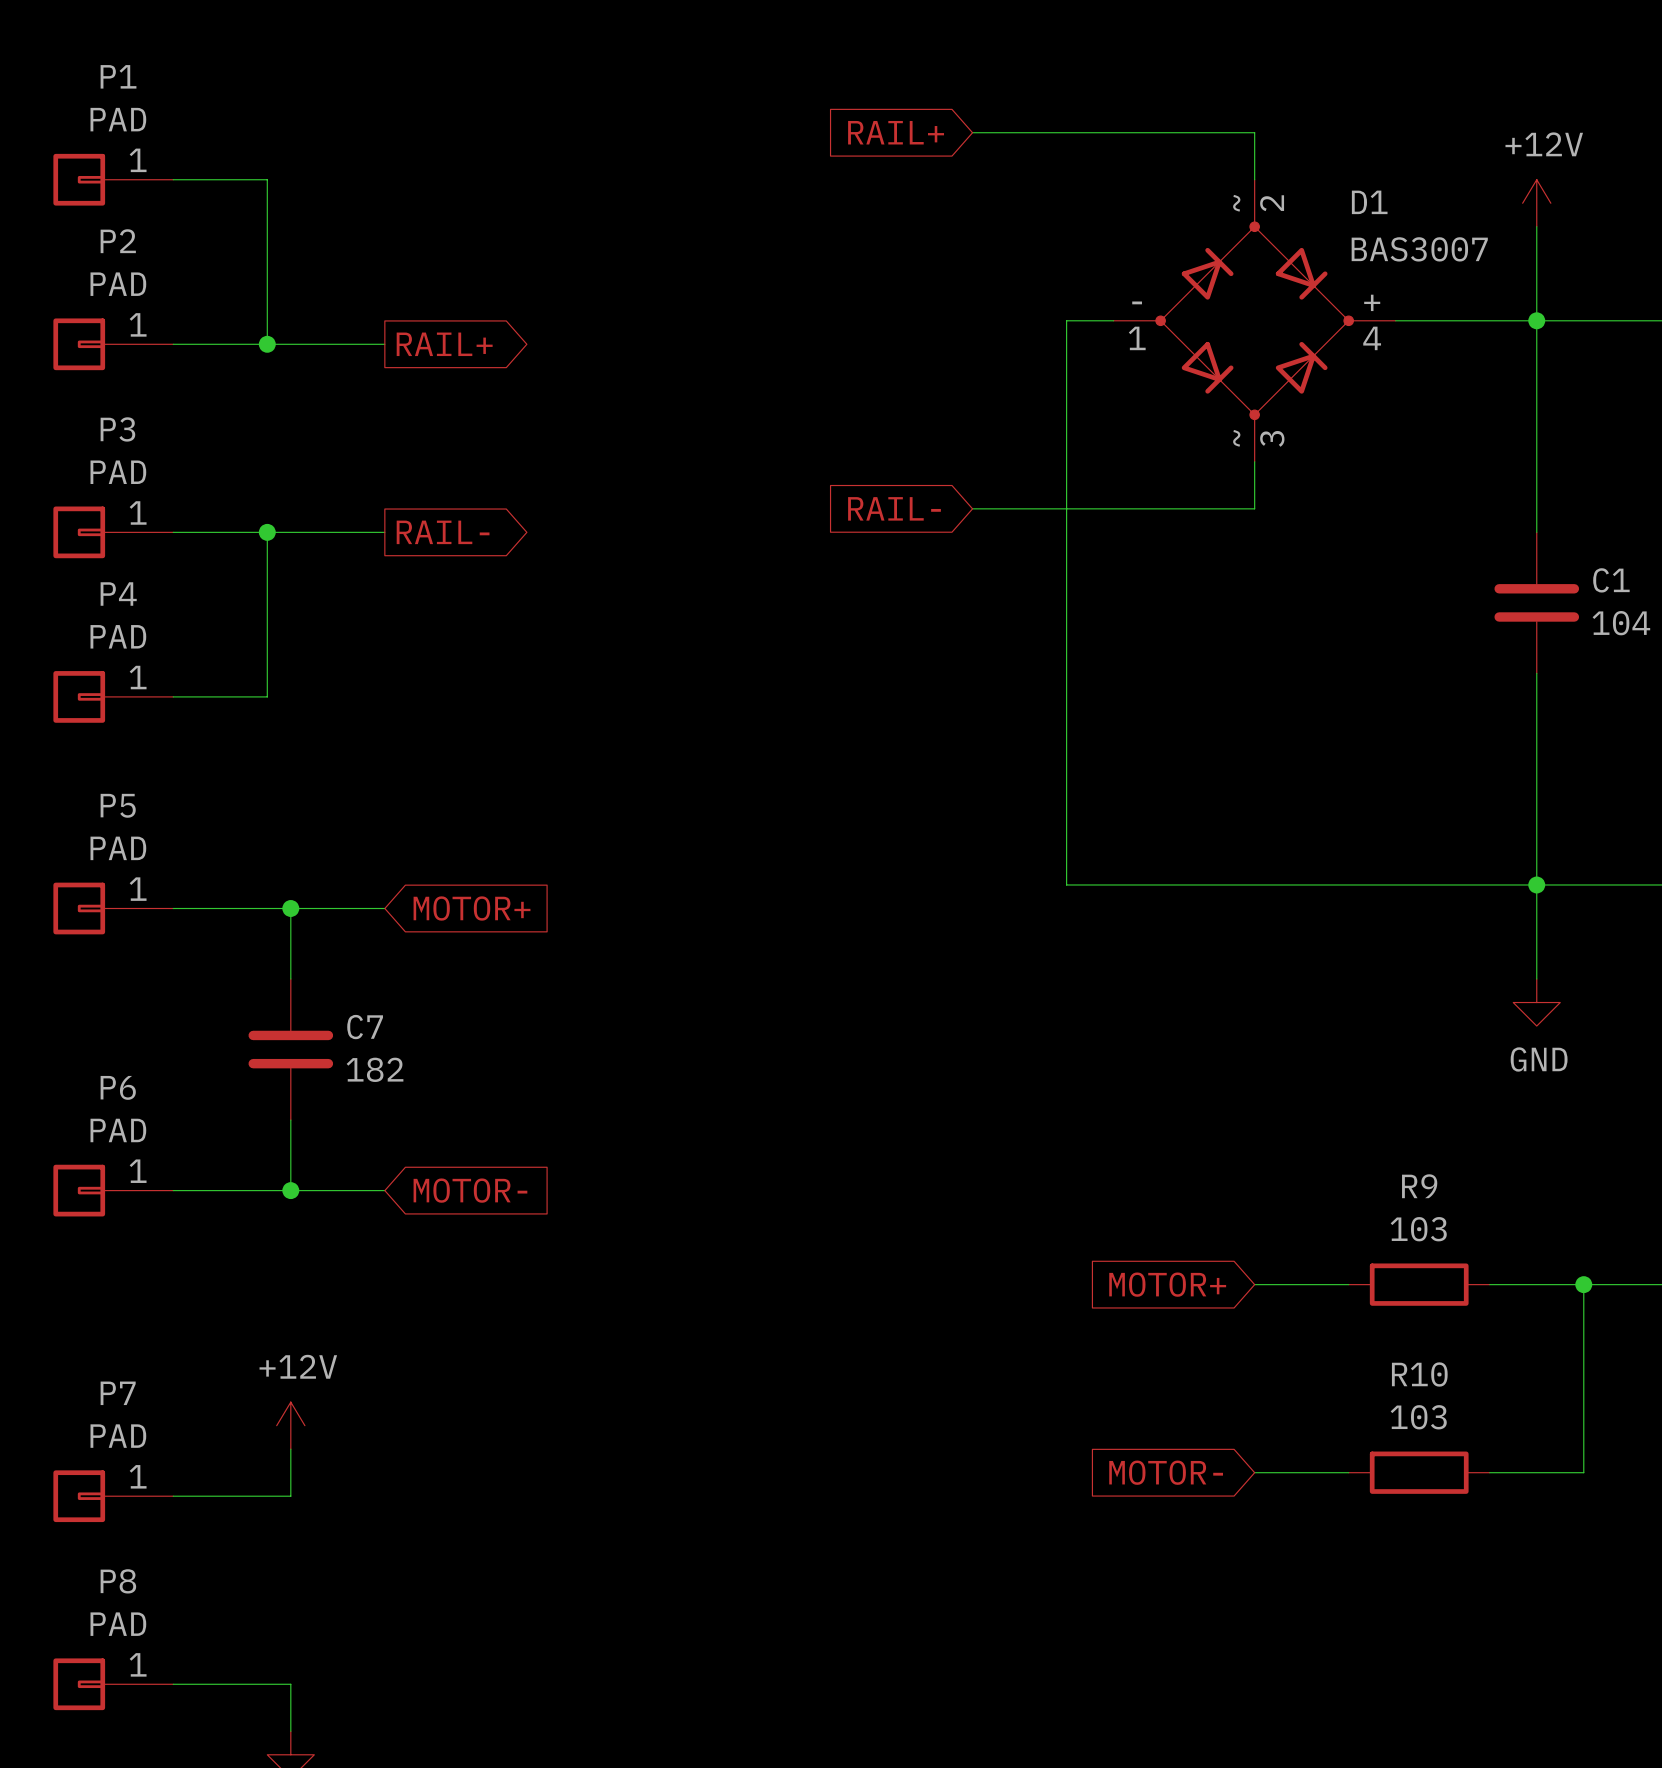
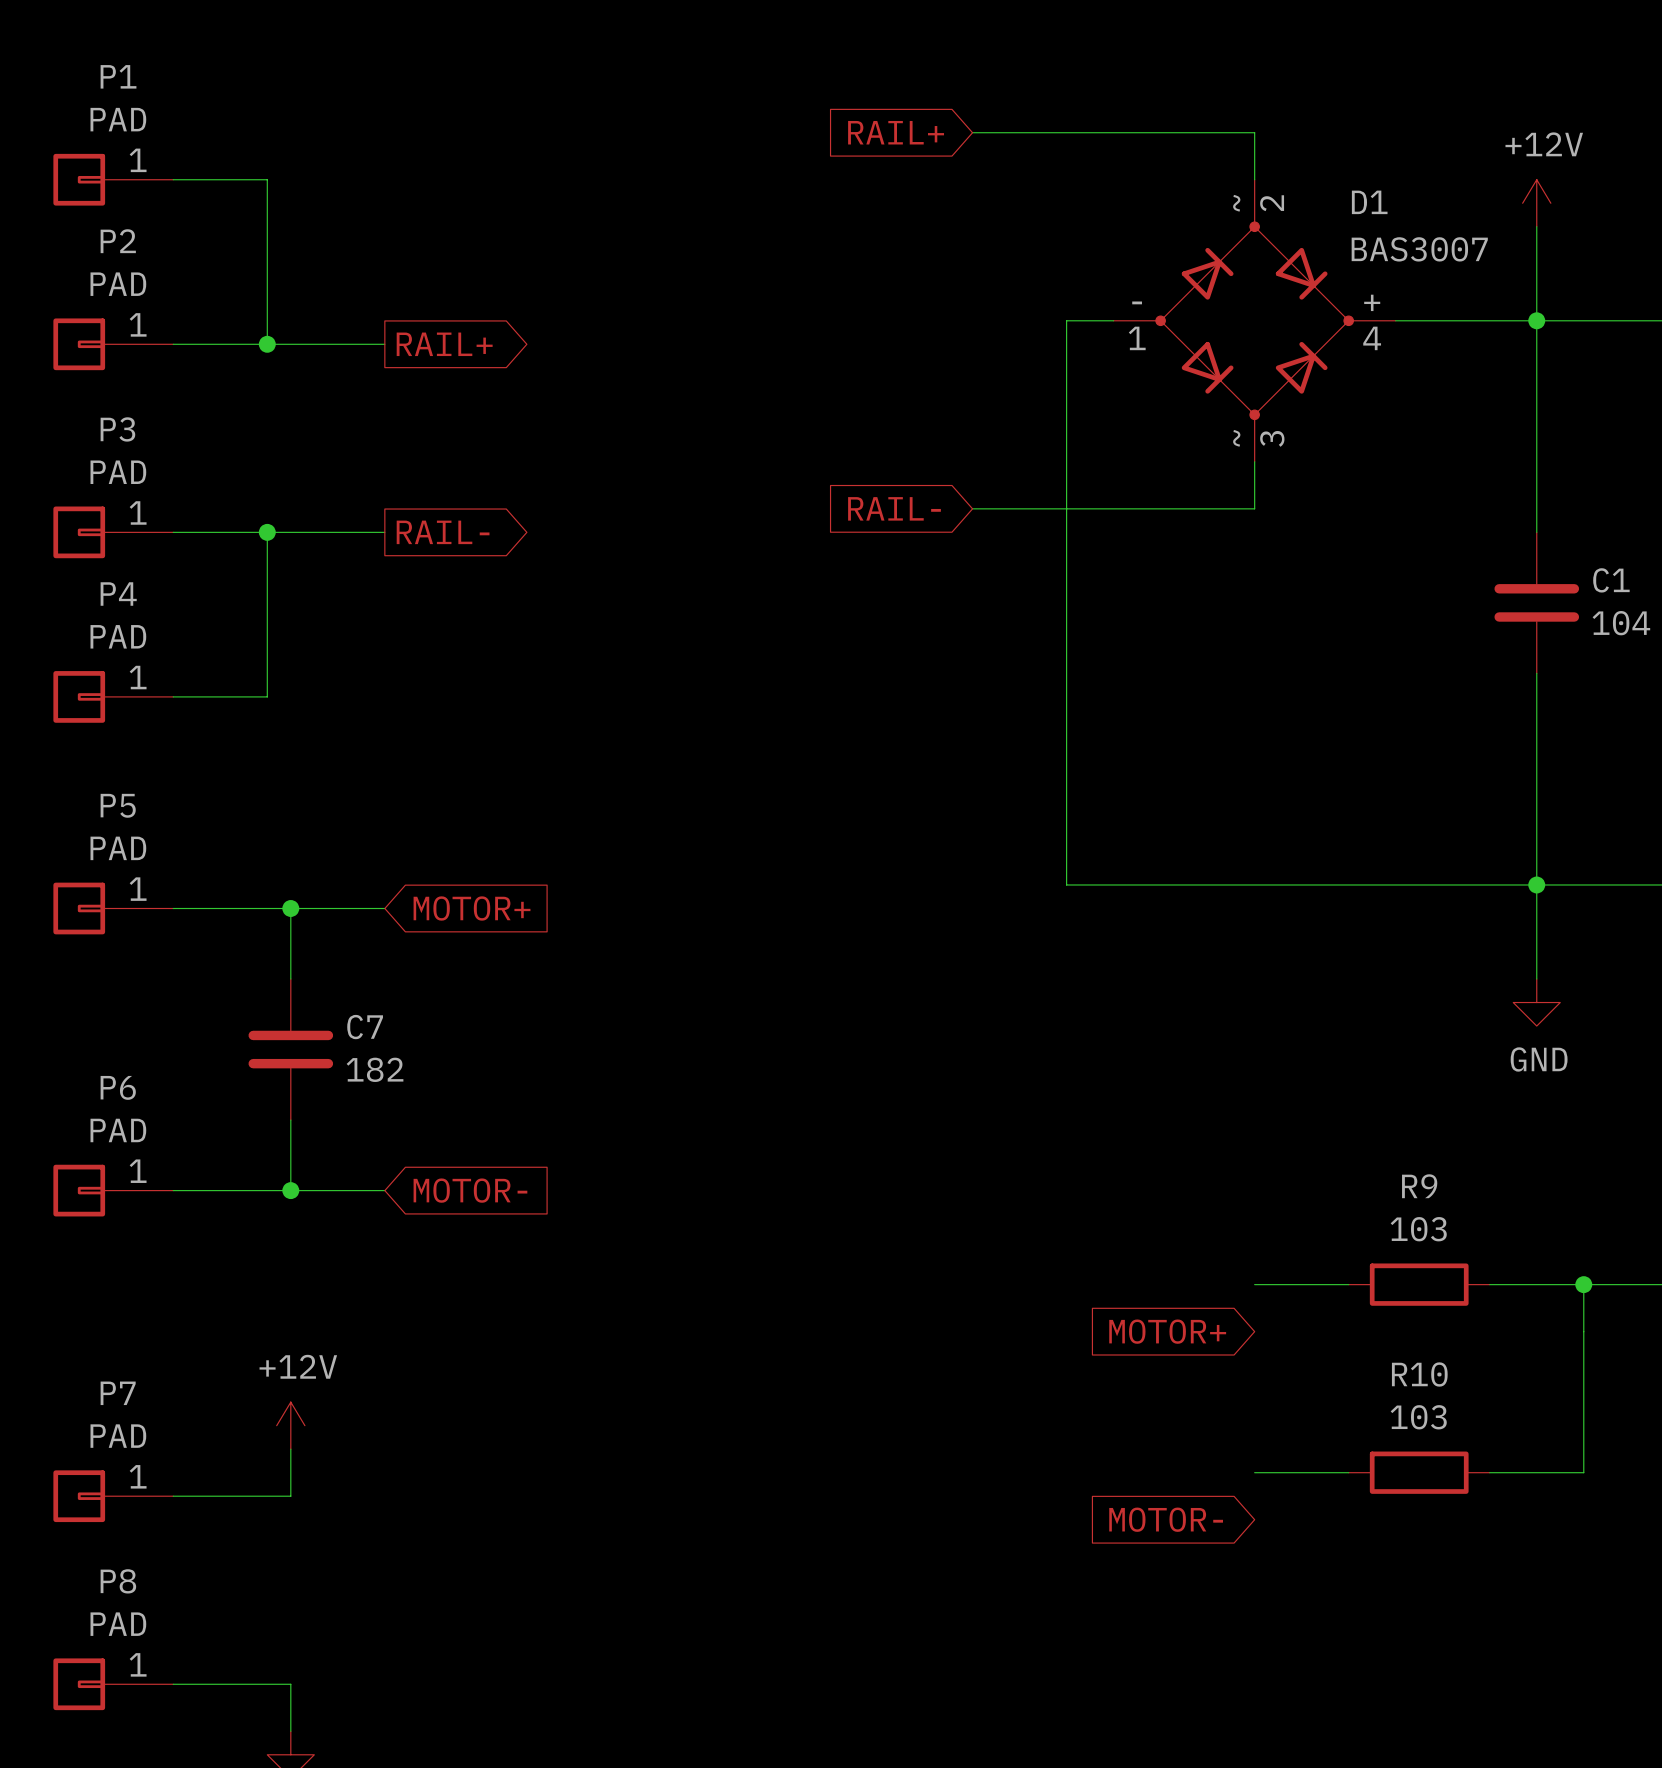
global label position: MOTOR+ (1167, 1284) -> MOTOR+ (1167, 1331)
global label position: MOTOR- (1166, 1472) -> MOTOR- (1166, 1519)

